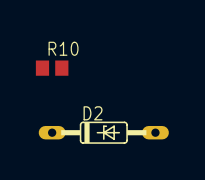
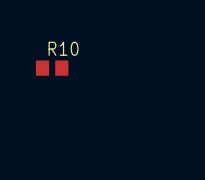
D2: (103, 132) -> none

